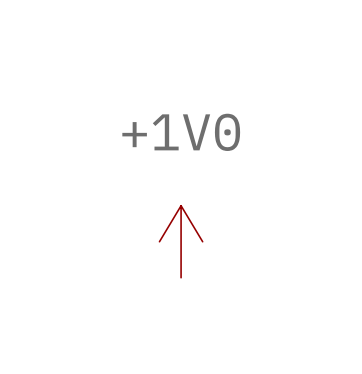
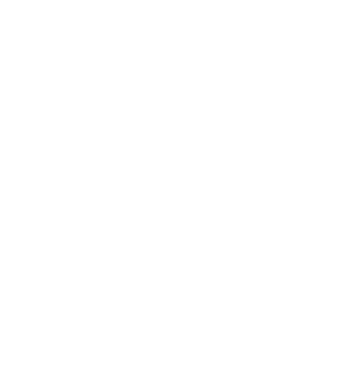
power symbol: +1V0 (181, 241) -> none

